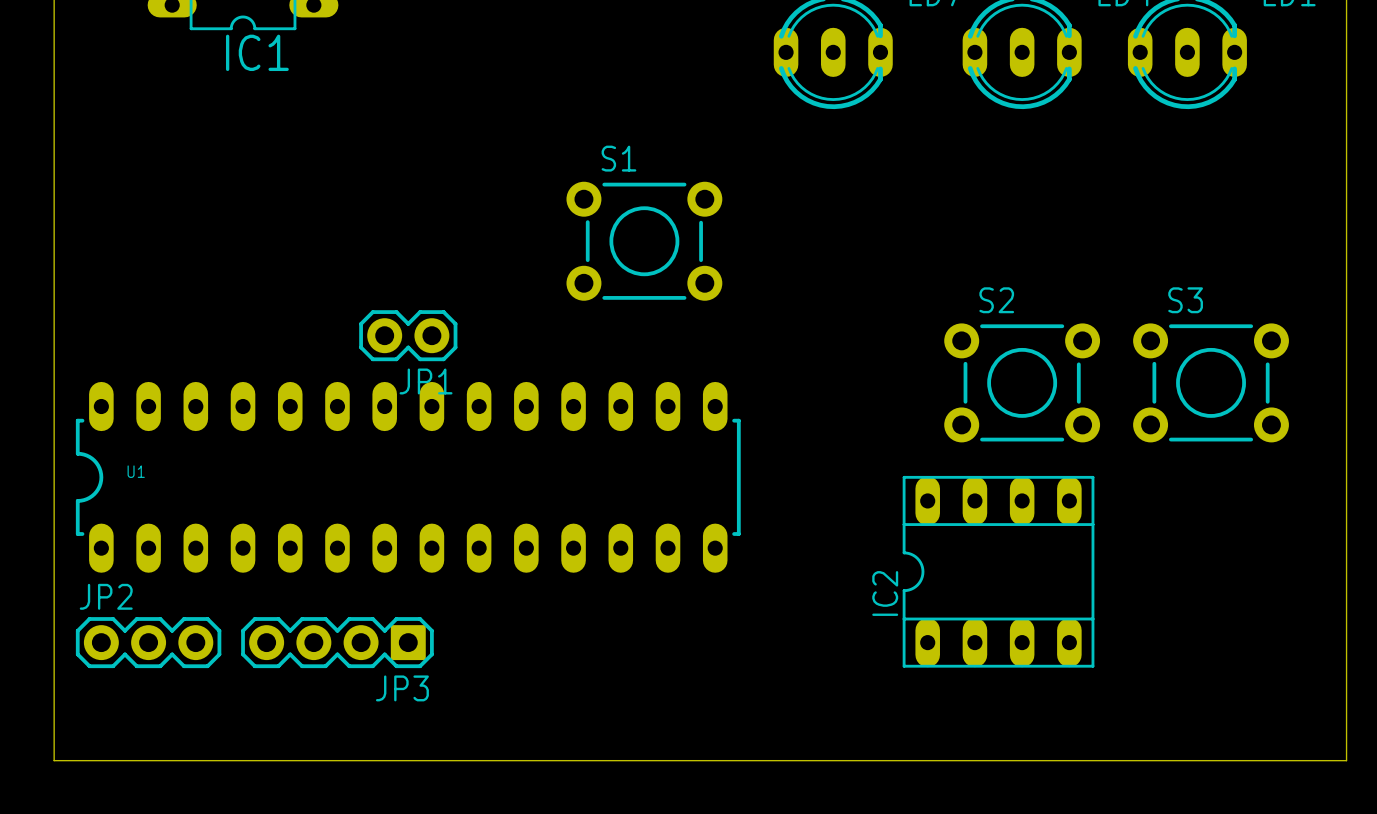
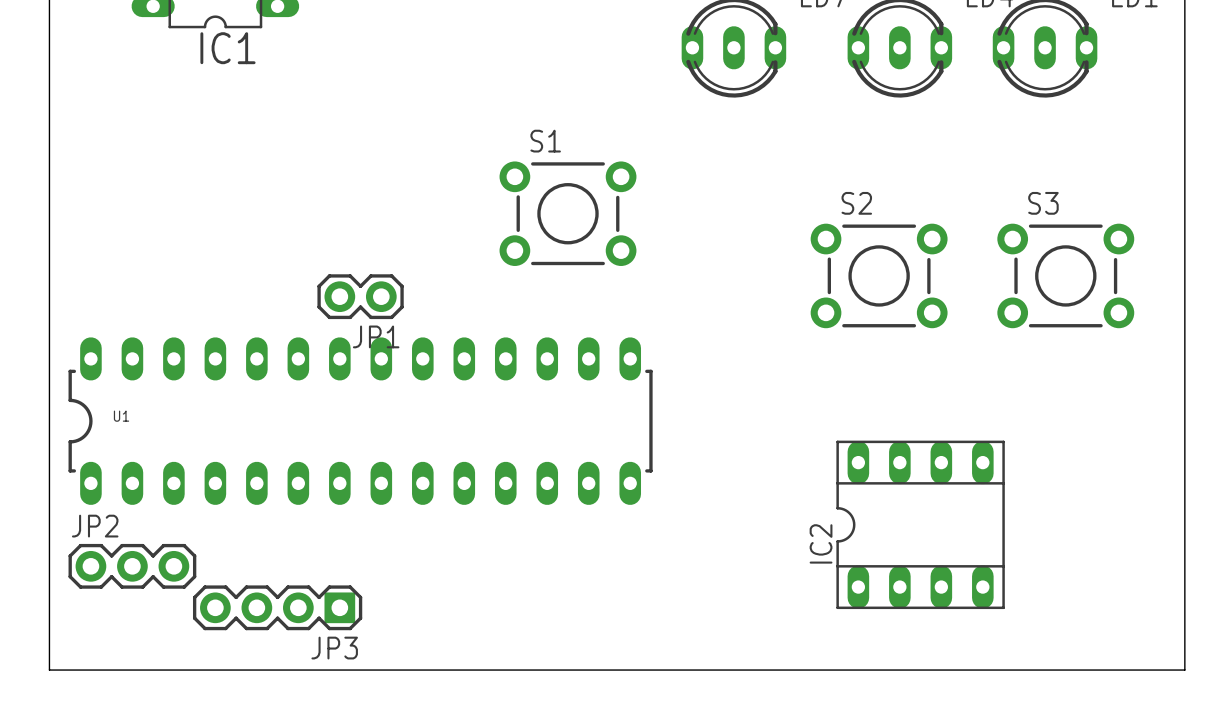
S2 position: (1022, 382) -> (879, 275)
S3 position: (1211, 382) -> (1065, 275)
IC2 position: (998, 571) -> (920, 524)
JP3 position: (337, 642) -> (277, 607)

